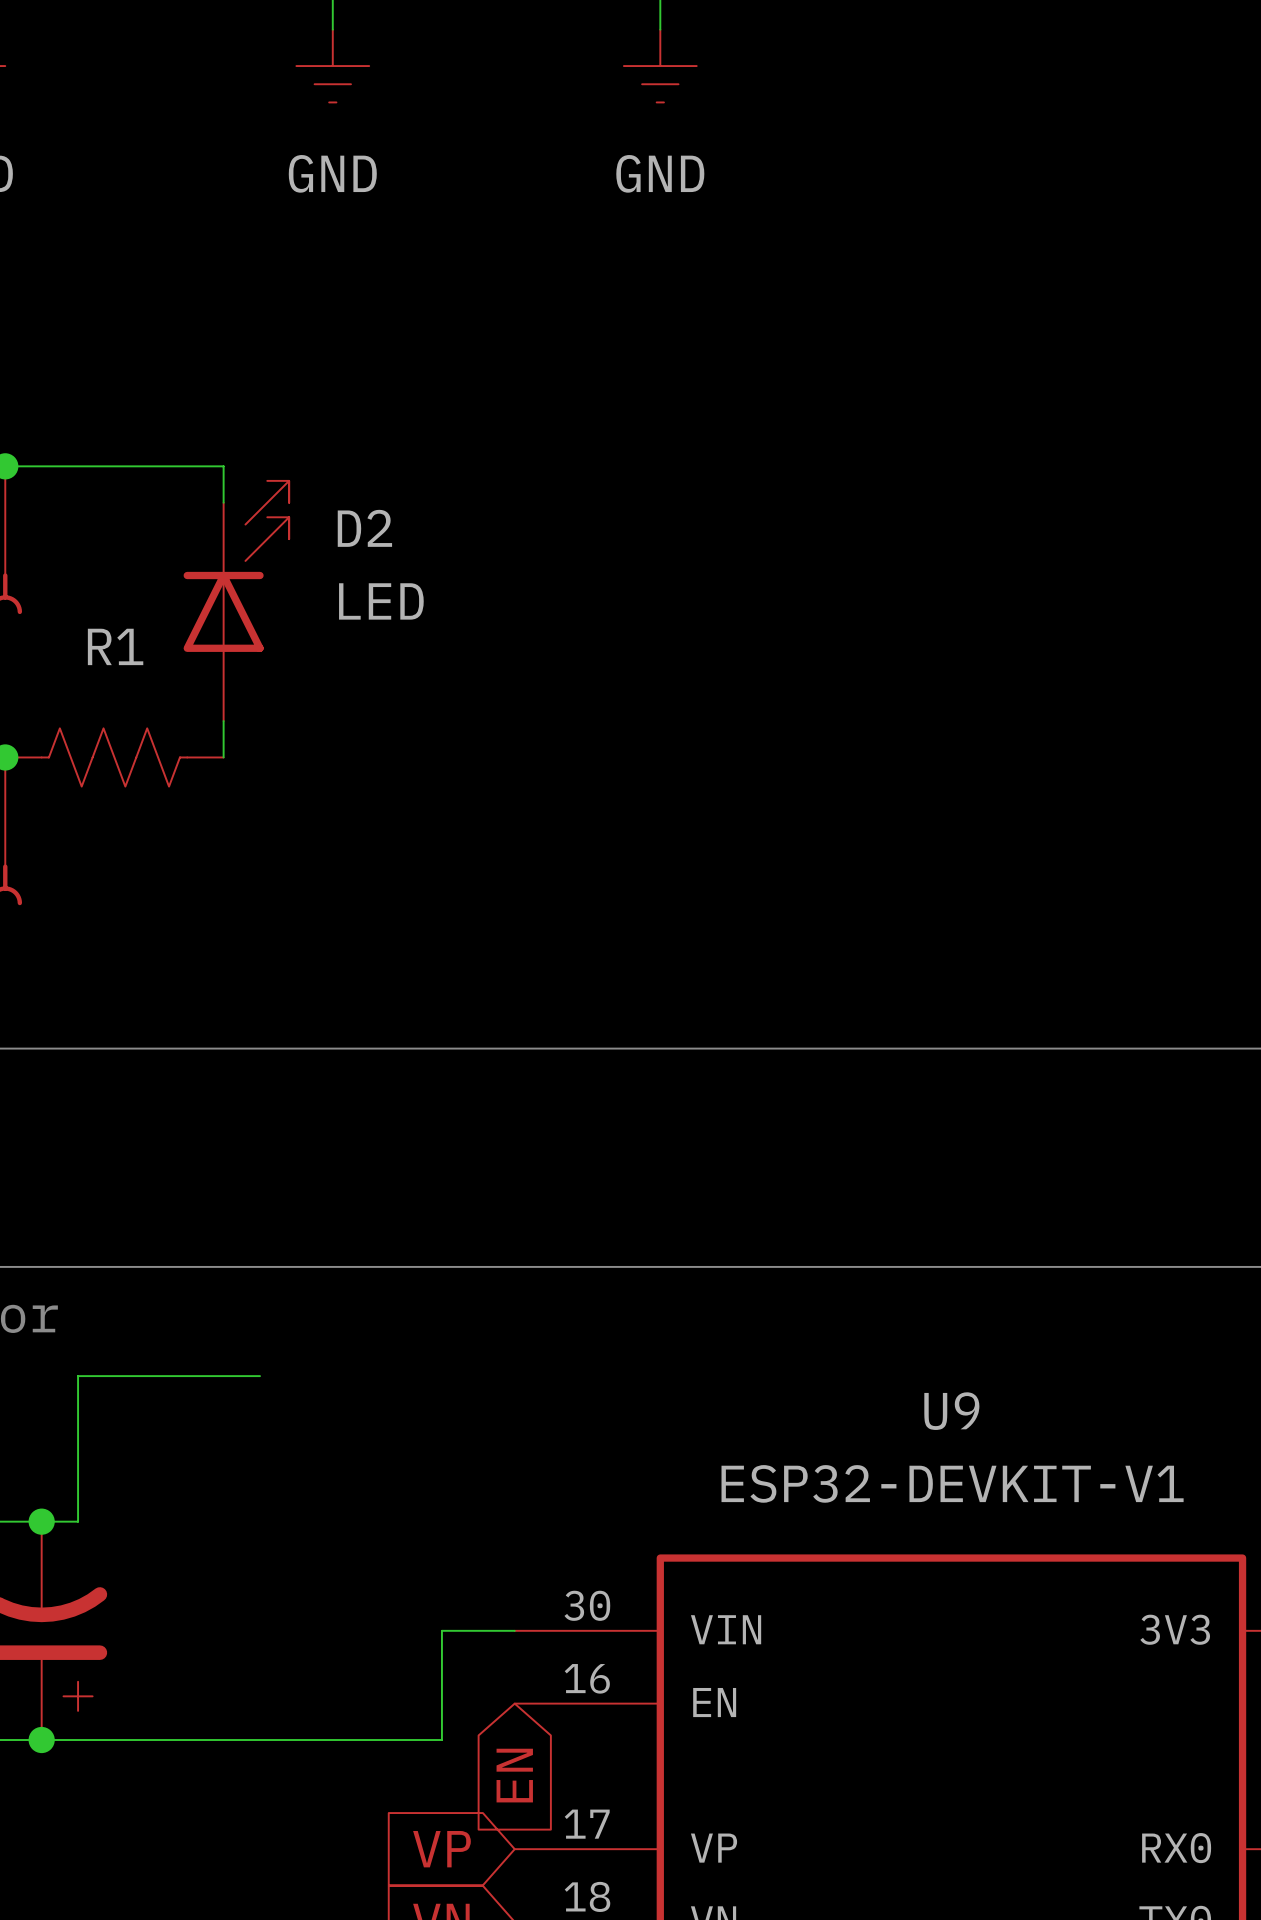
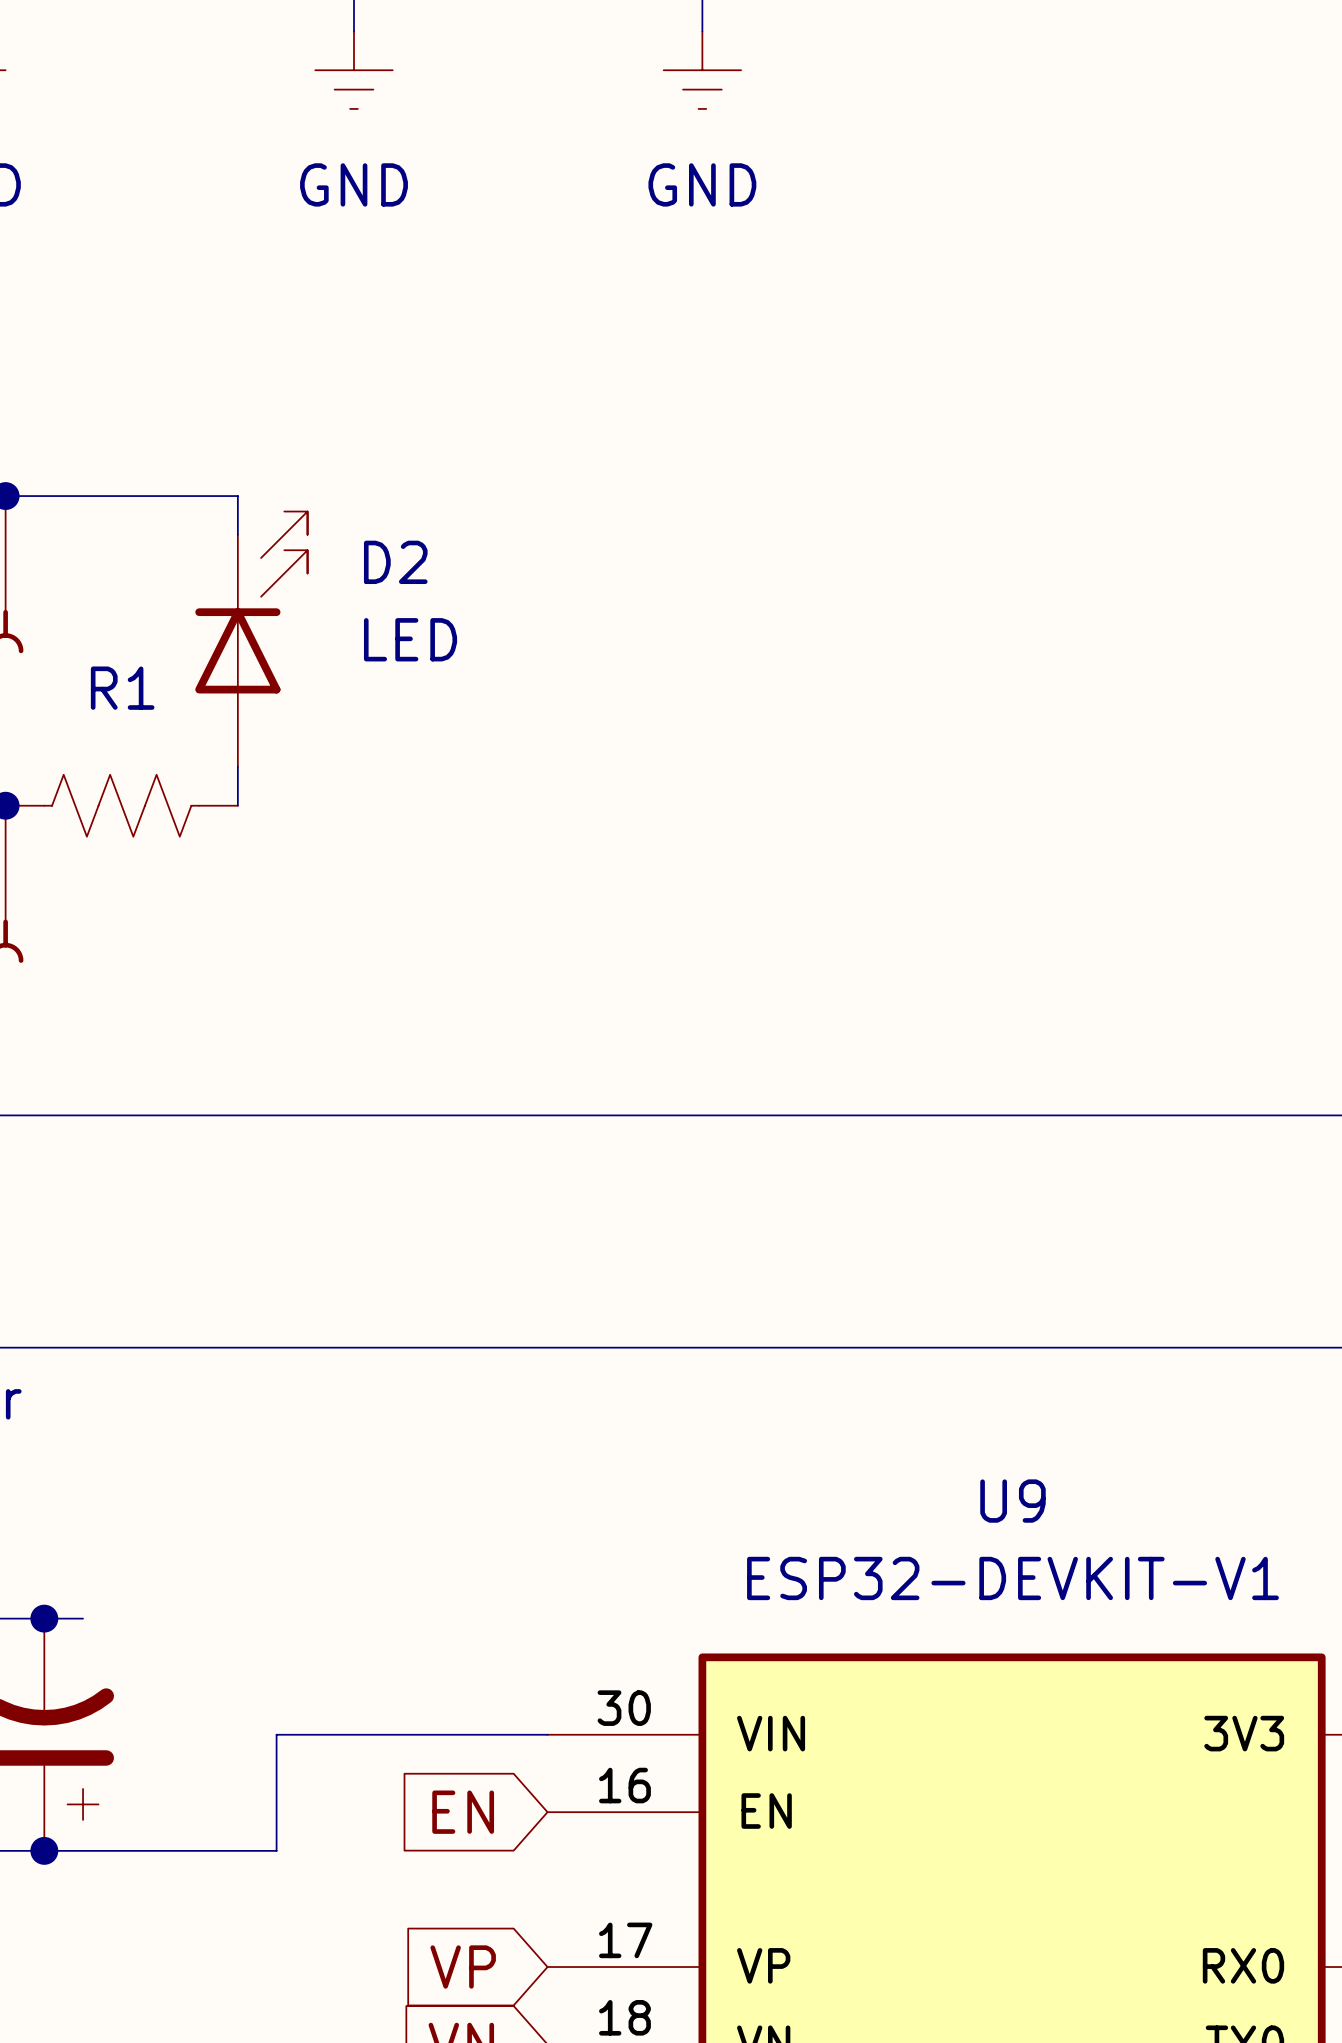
wire: (260, 1376) (78, 1376) (78, 1521) -> none
wire: (441, 1630) (441, 1740) (260, 1740) -> (470, 1734) (276, 1734) (276, 1850)
global label rotation: 0° (514, 1775) -> 90° clockwise (463, 1812)

